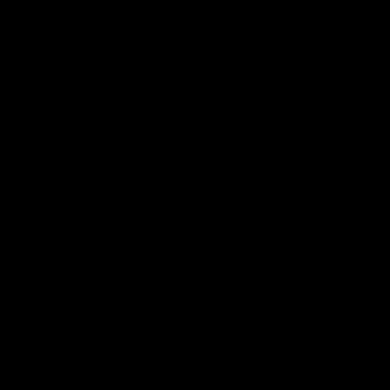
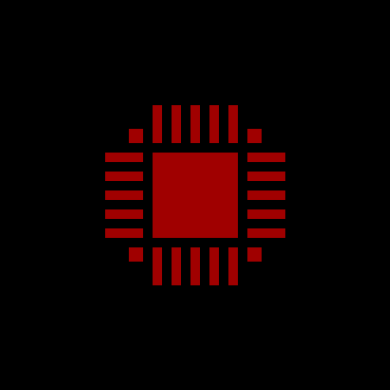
part: none -> (195, 195)

